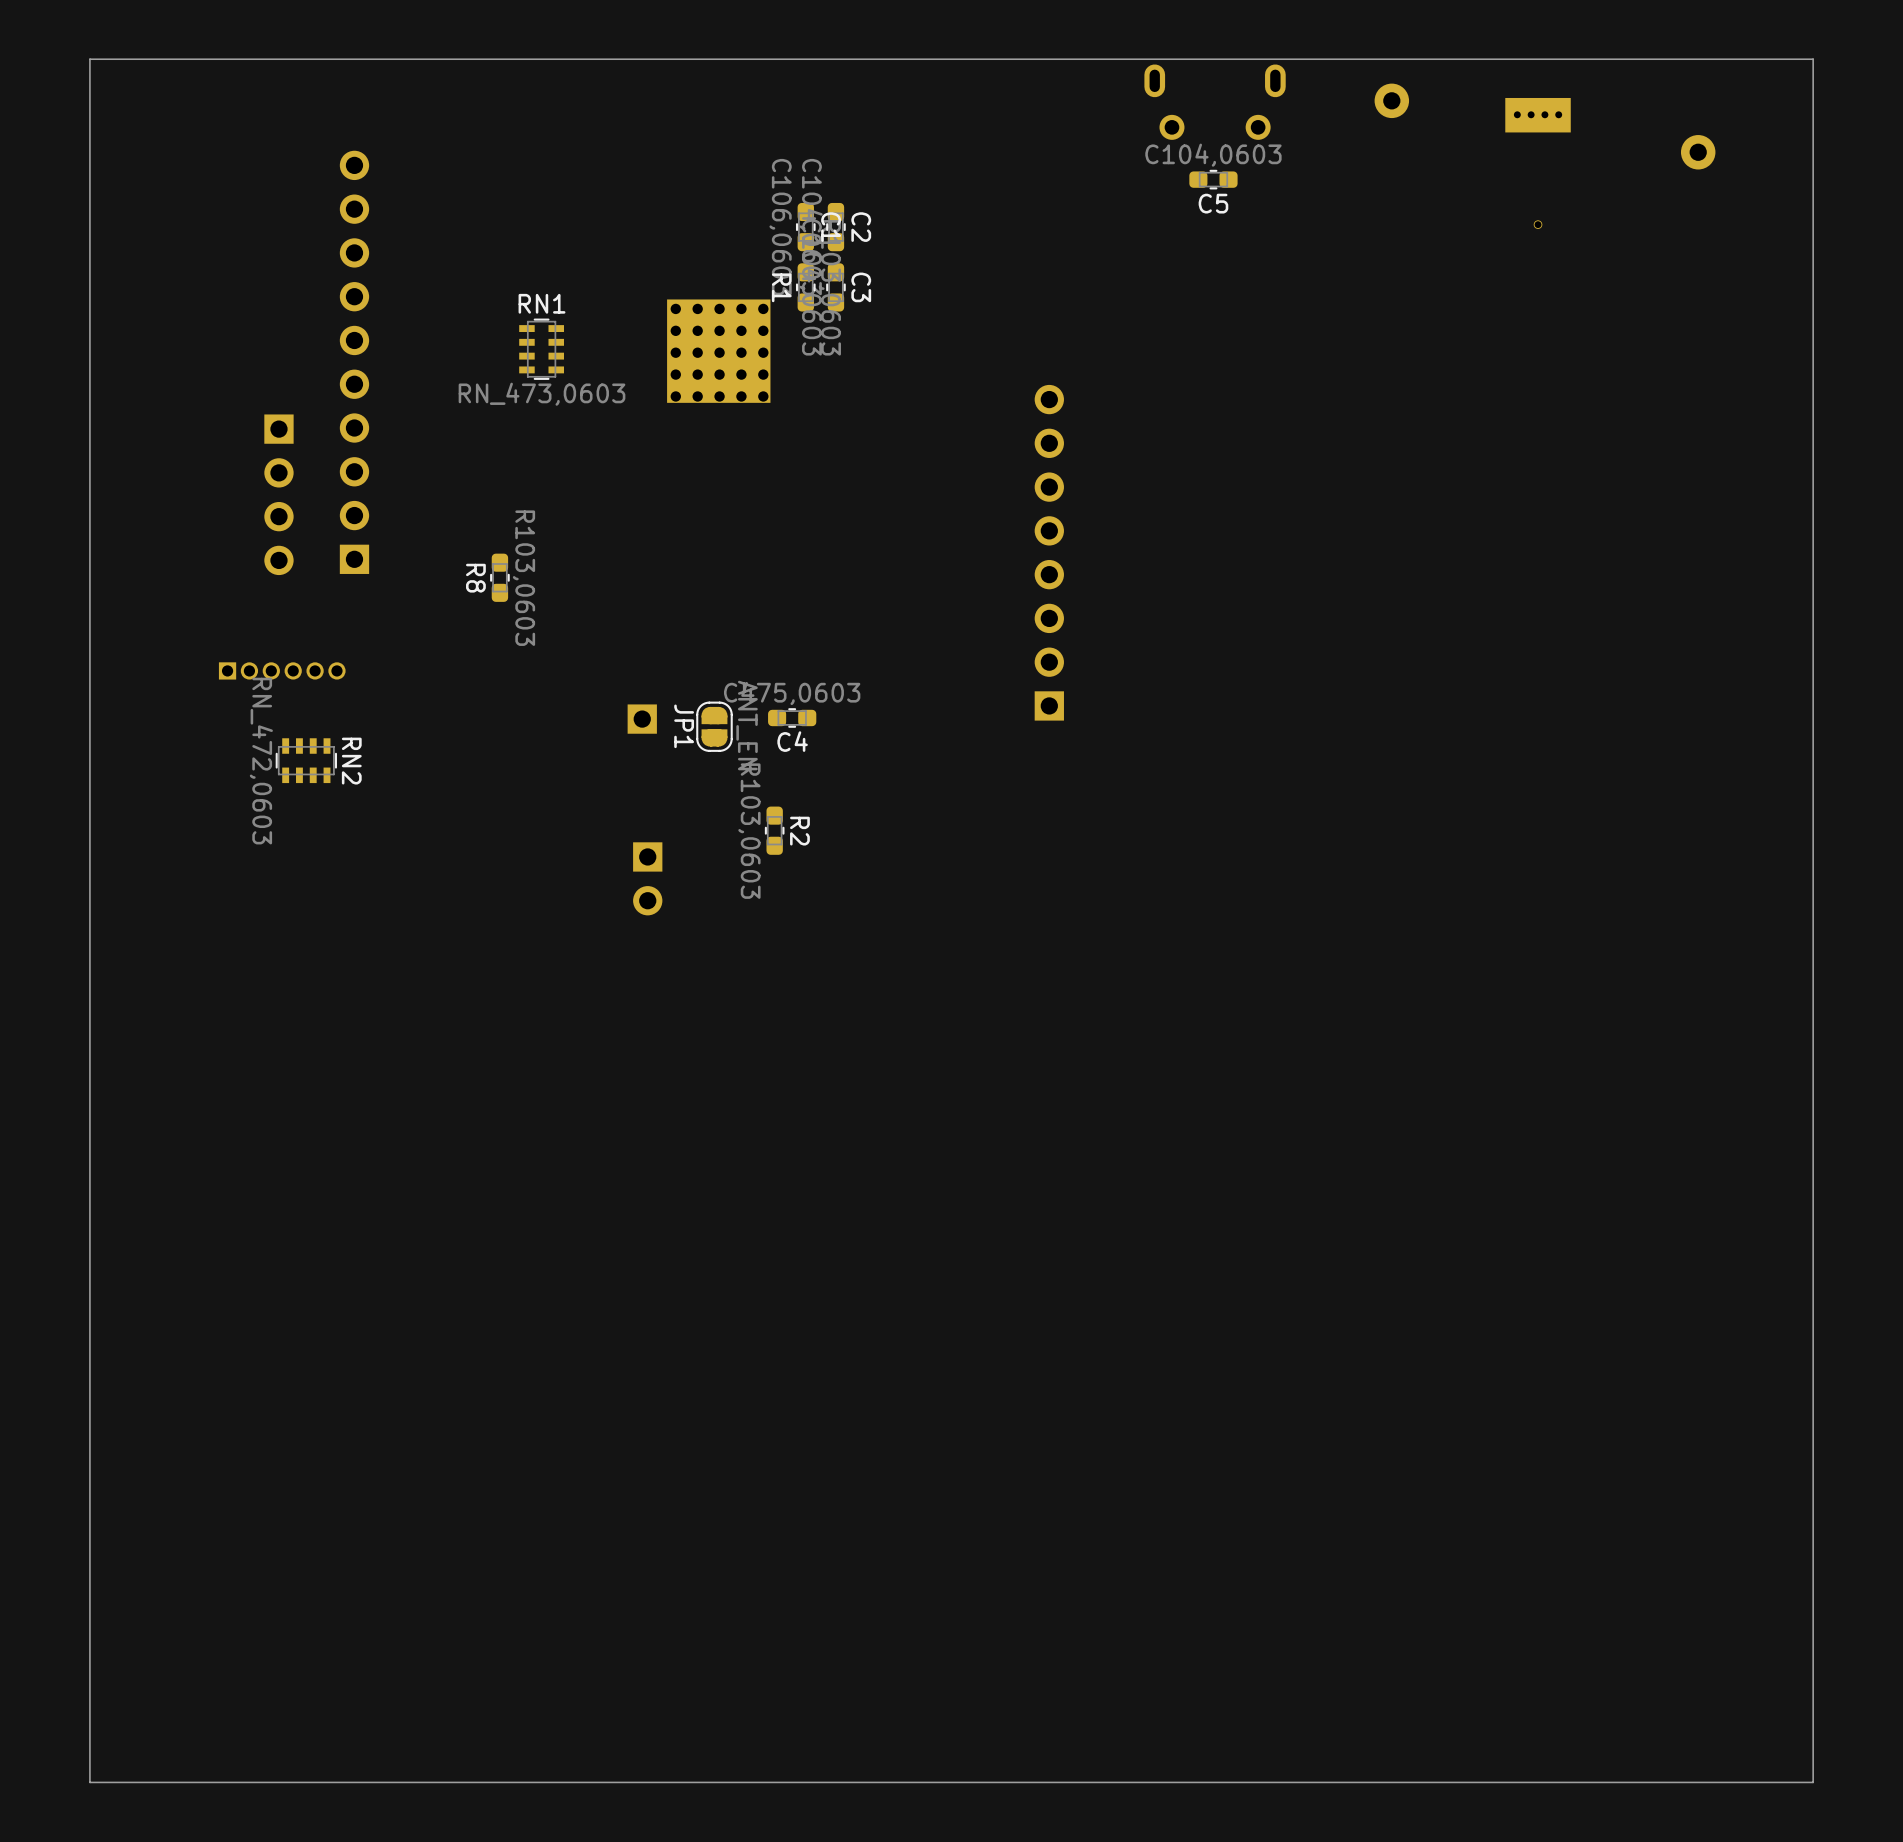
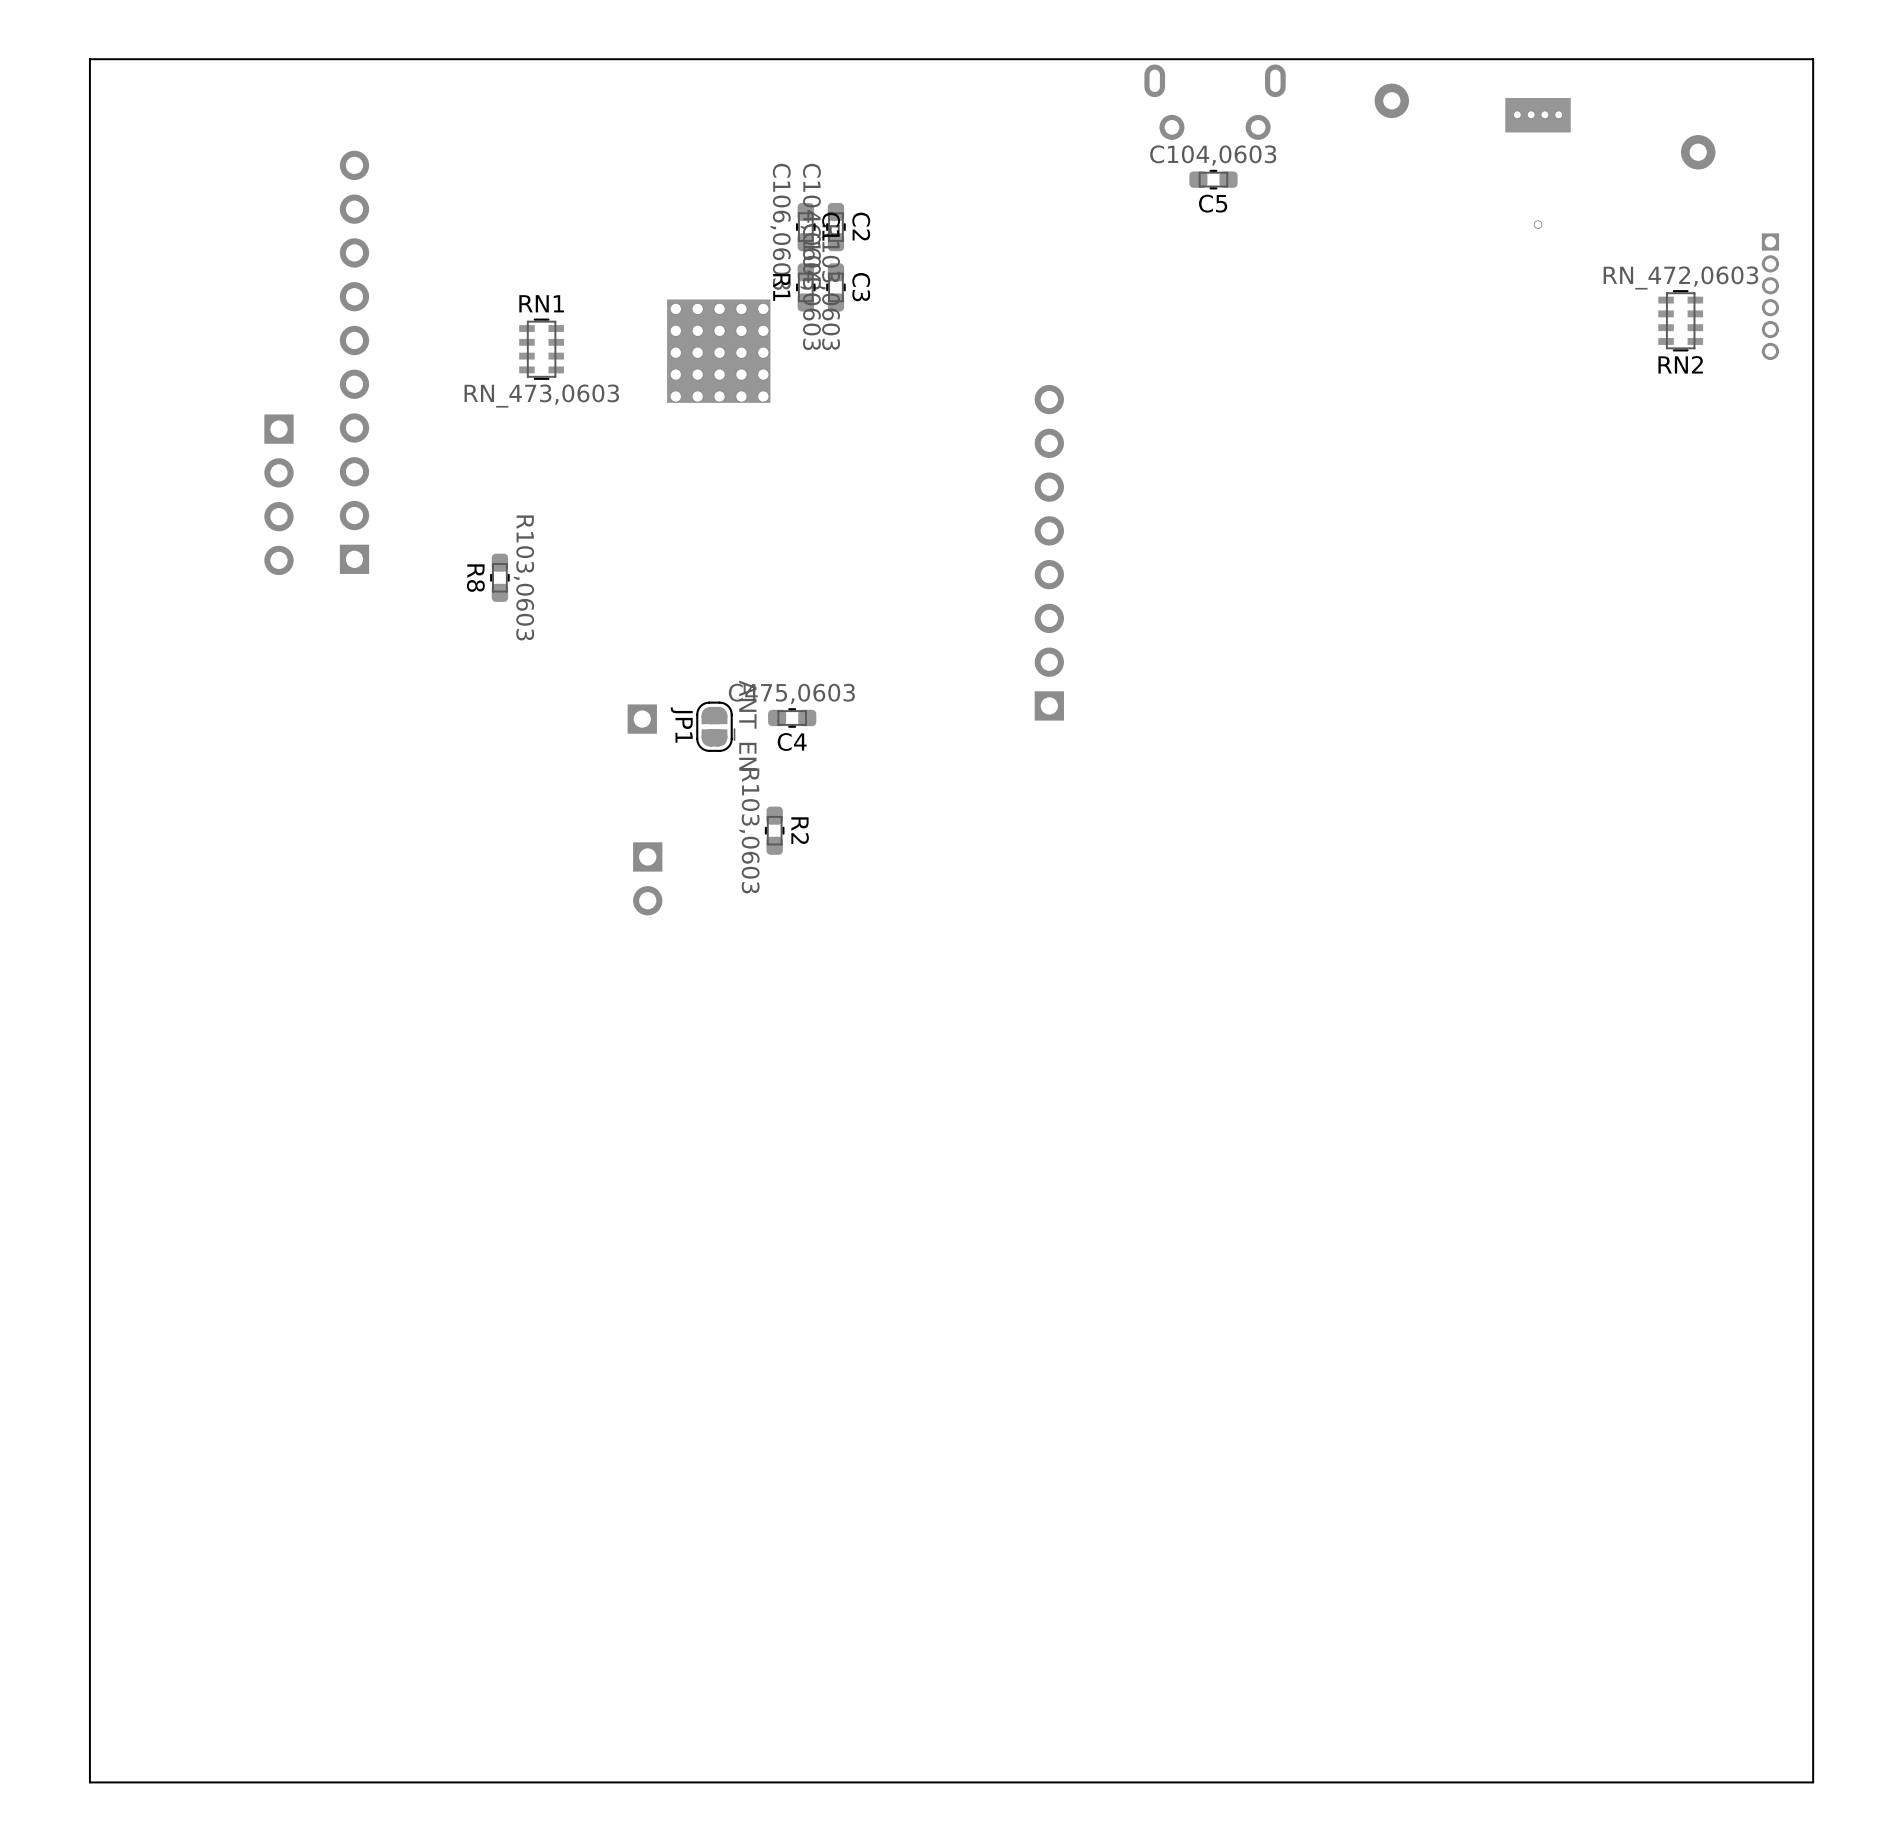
part: none -> (1770, 296)
part: (282, 670) -> none
RN2 rotation: 0° (306, 760) -> 90° clockwise (1680, 320)
RN2 position: (306, 760) -> (1680, 320)

